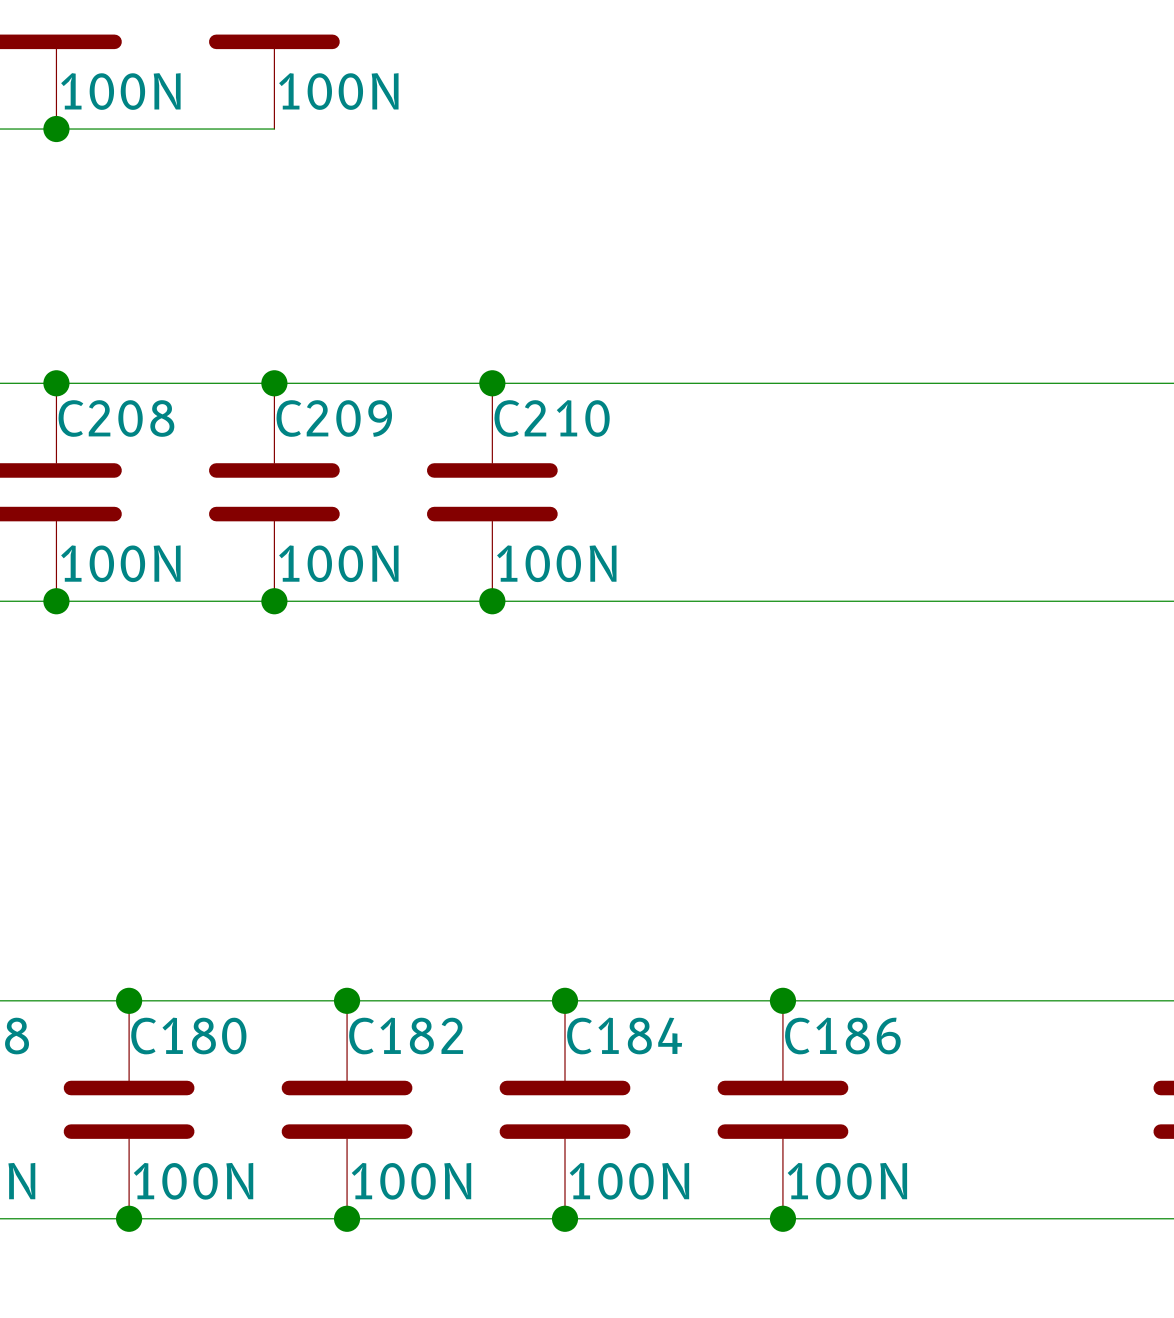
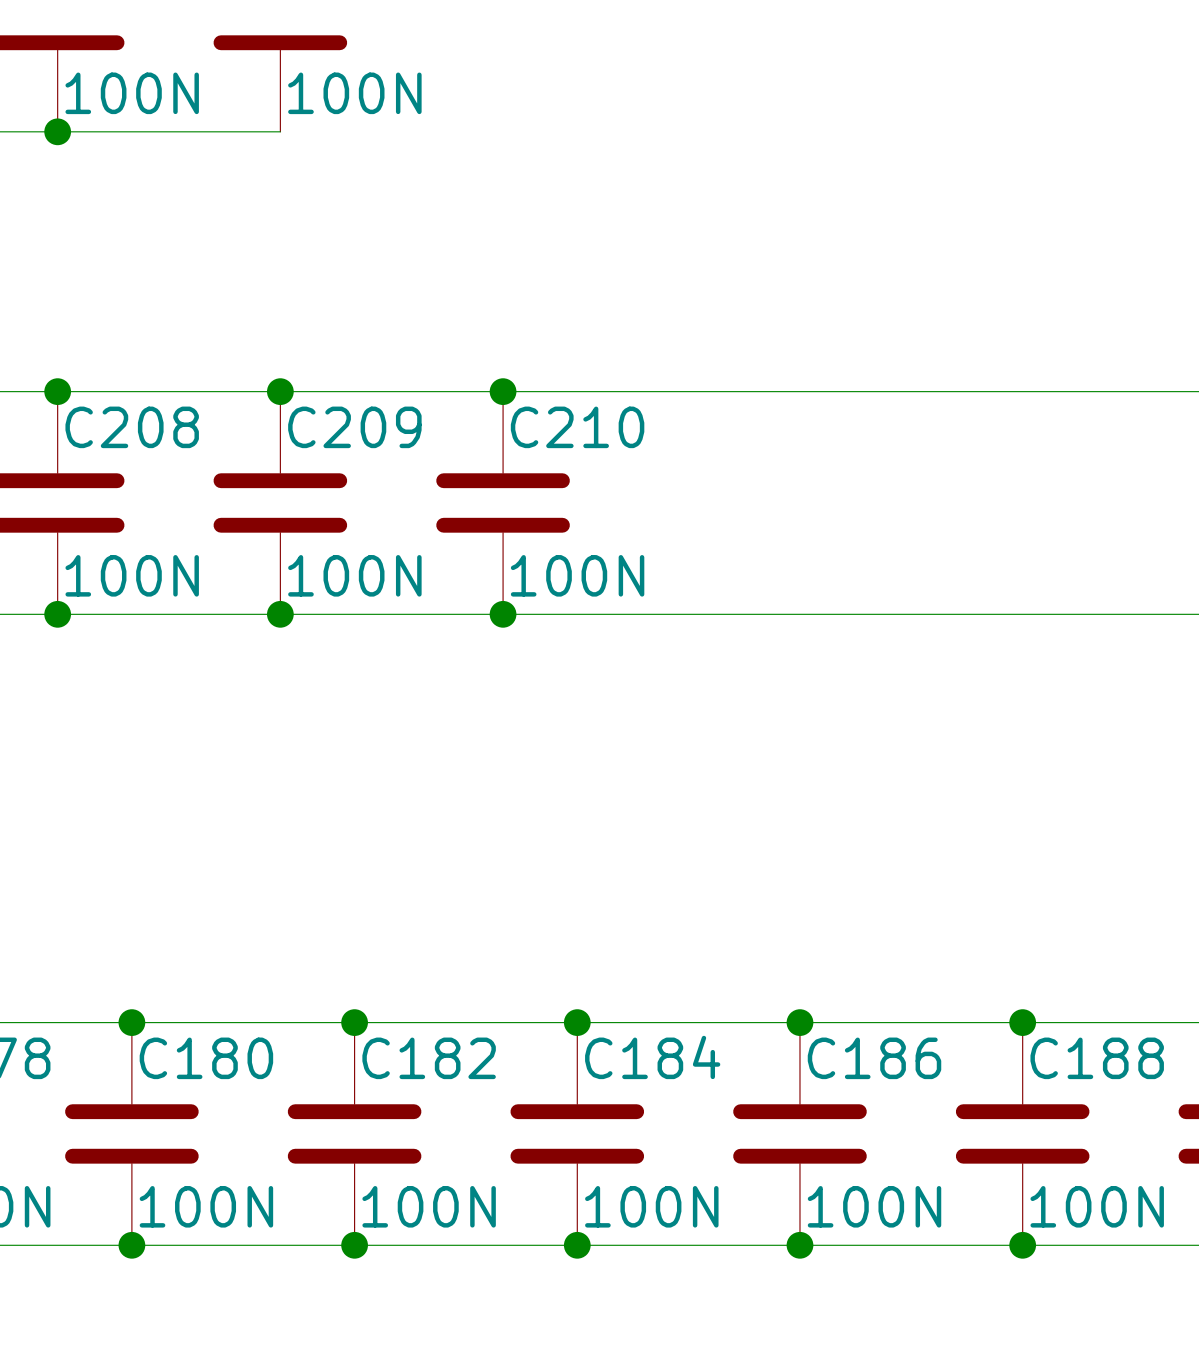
junction: none -> (1022, 1022)
C188: none -> 100N (1022, 1133)
junction: none -> (1022, 1245)

